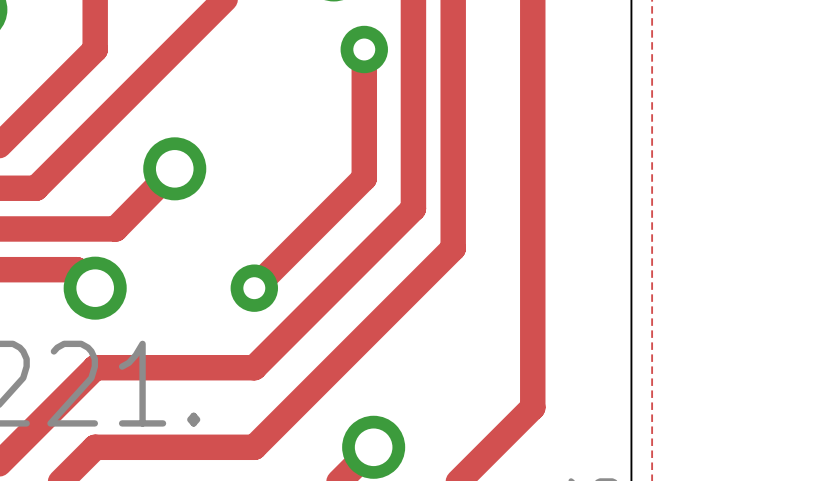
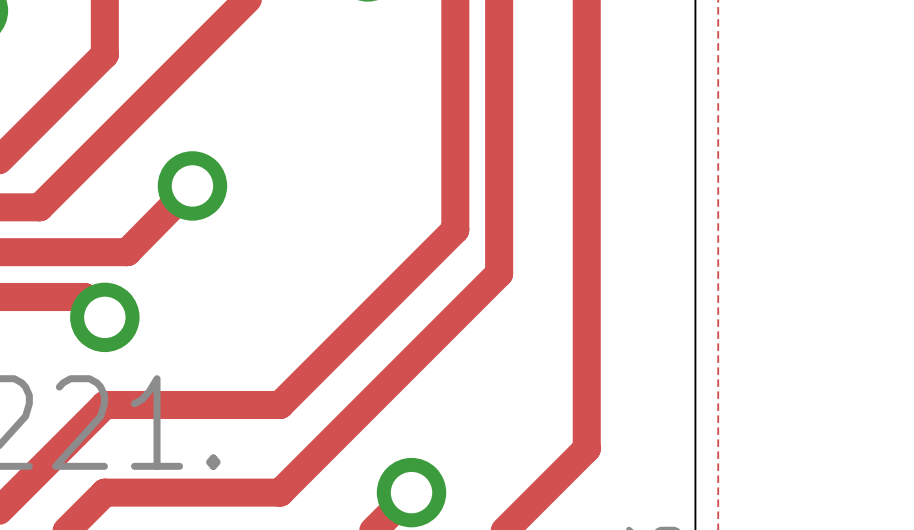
track: (364, 49) (364, 178) (254, 288) -> none
via: (364, 49) -> none
via: (254, 288) -> none

